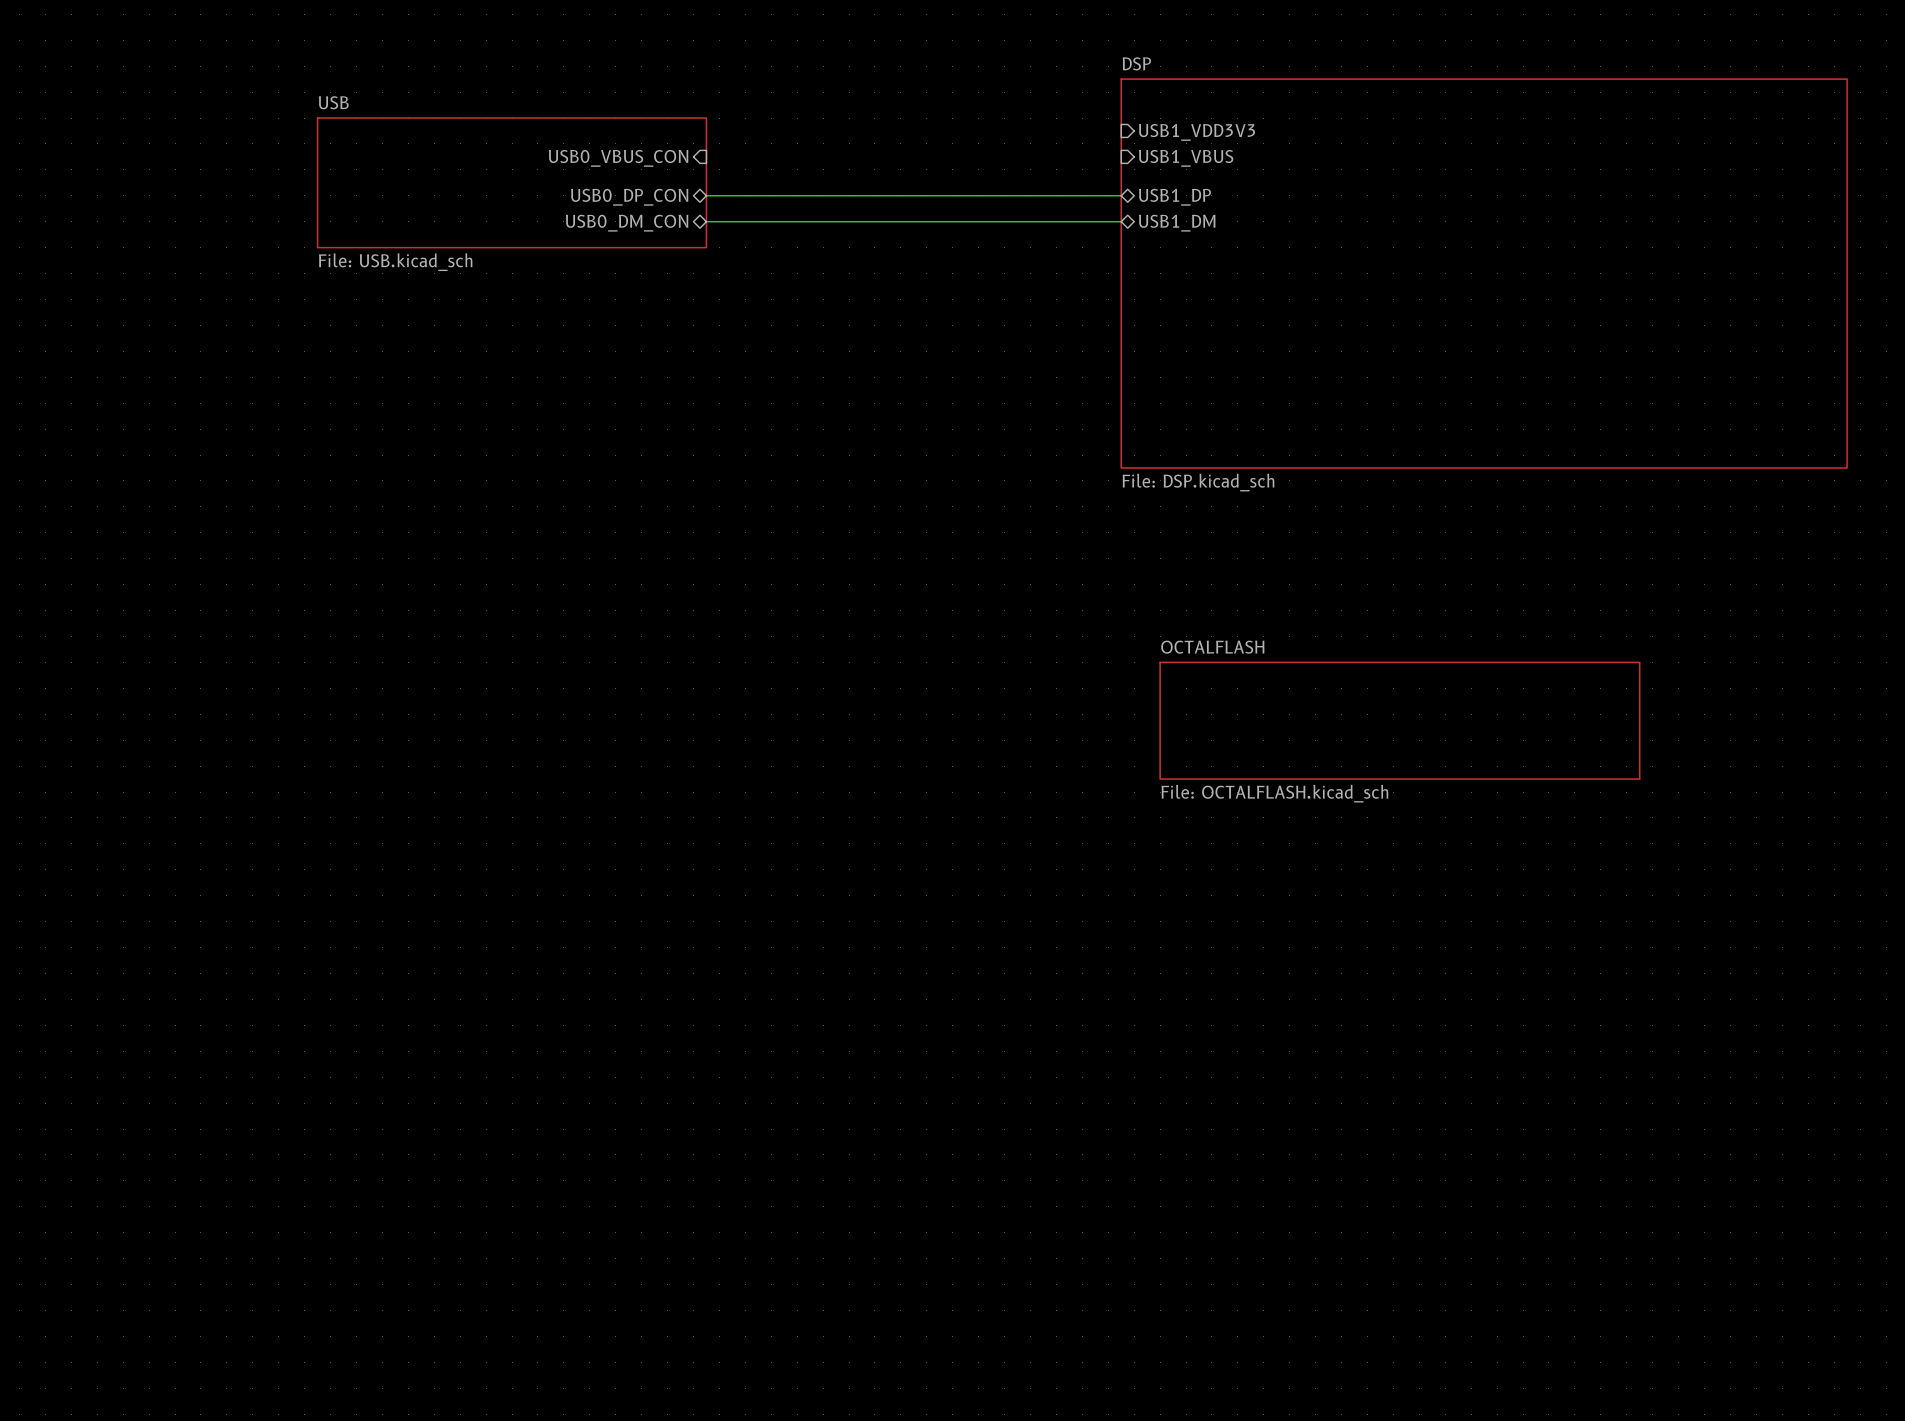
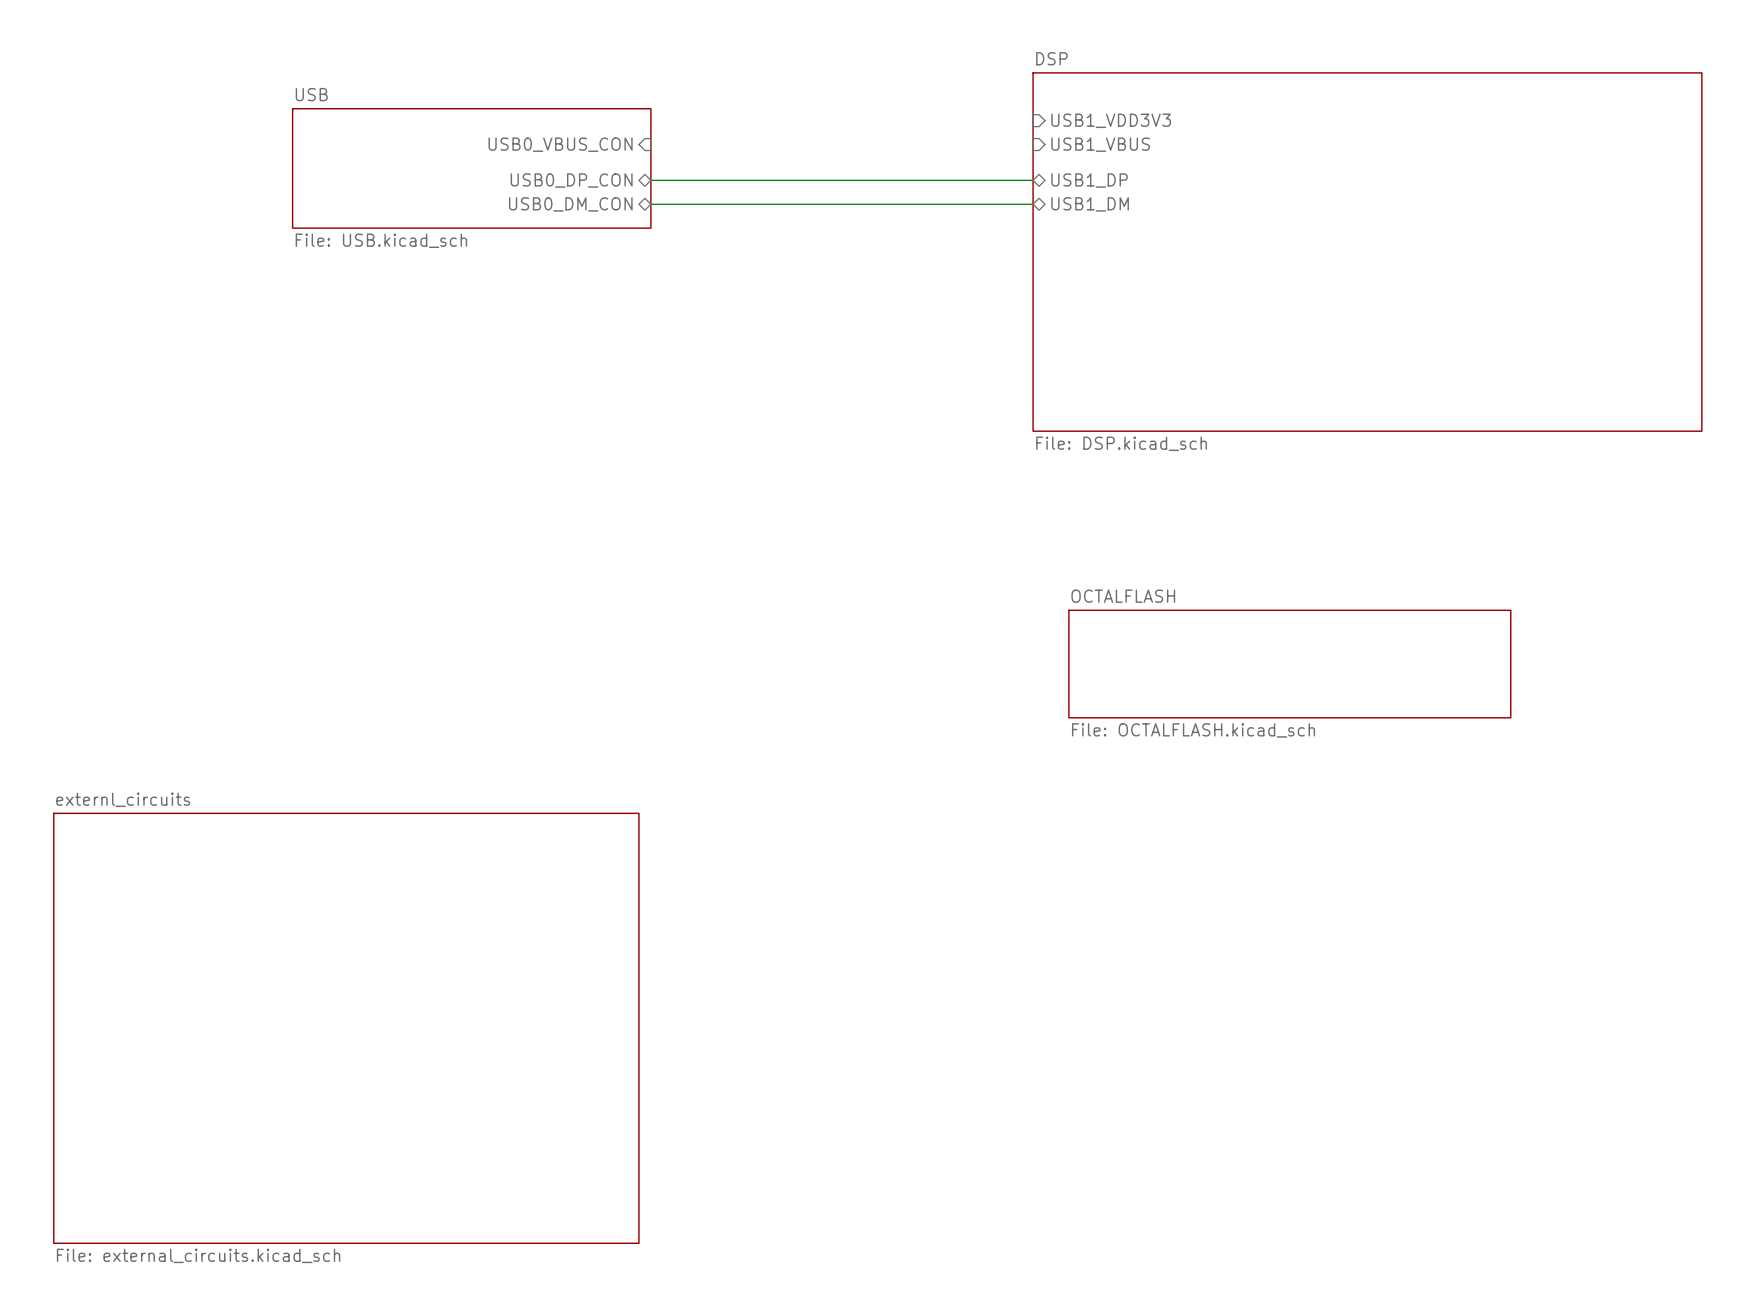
sheet externl_circuits: none -> File: external_circuits.kicad_sch (346, 1028)

